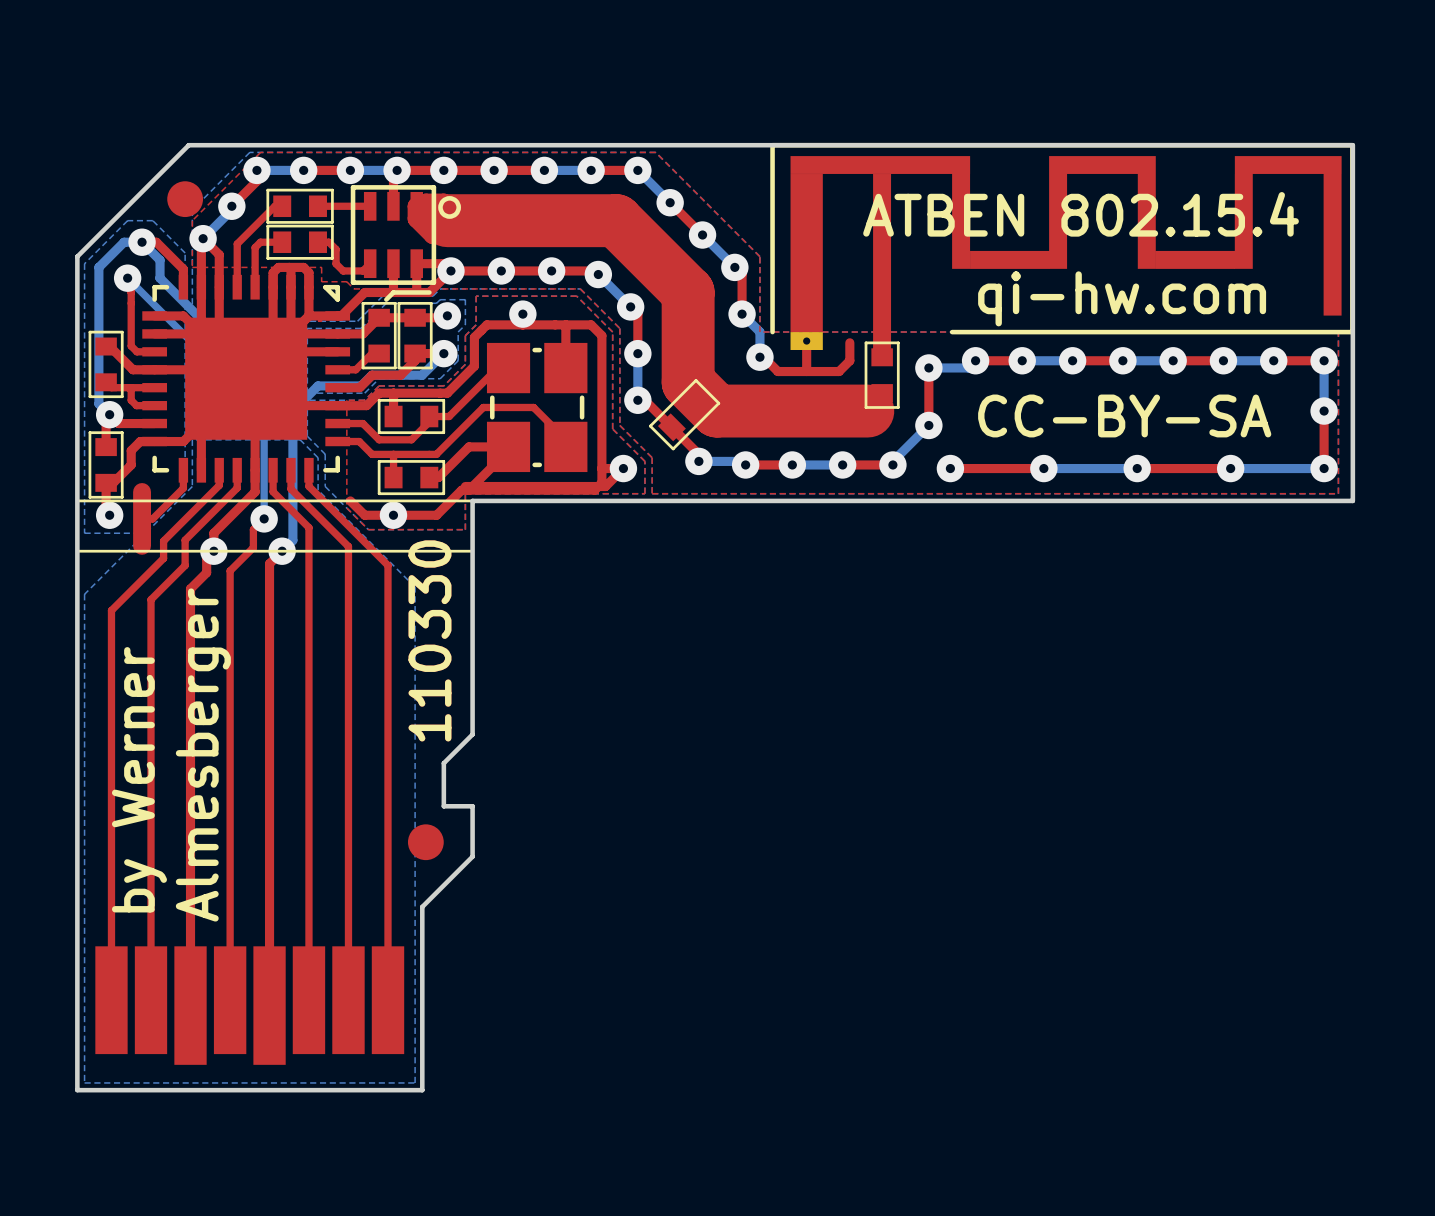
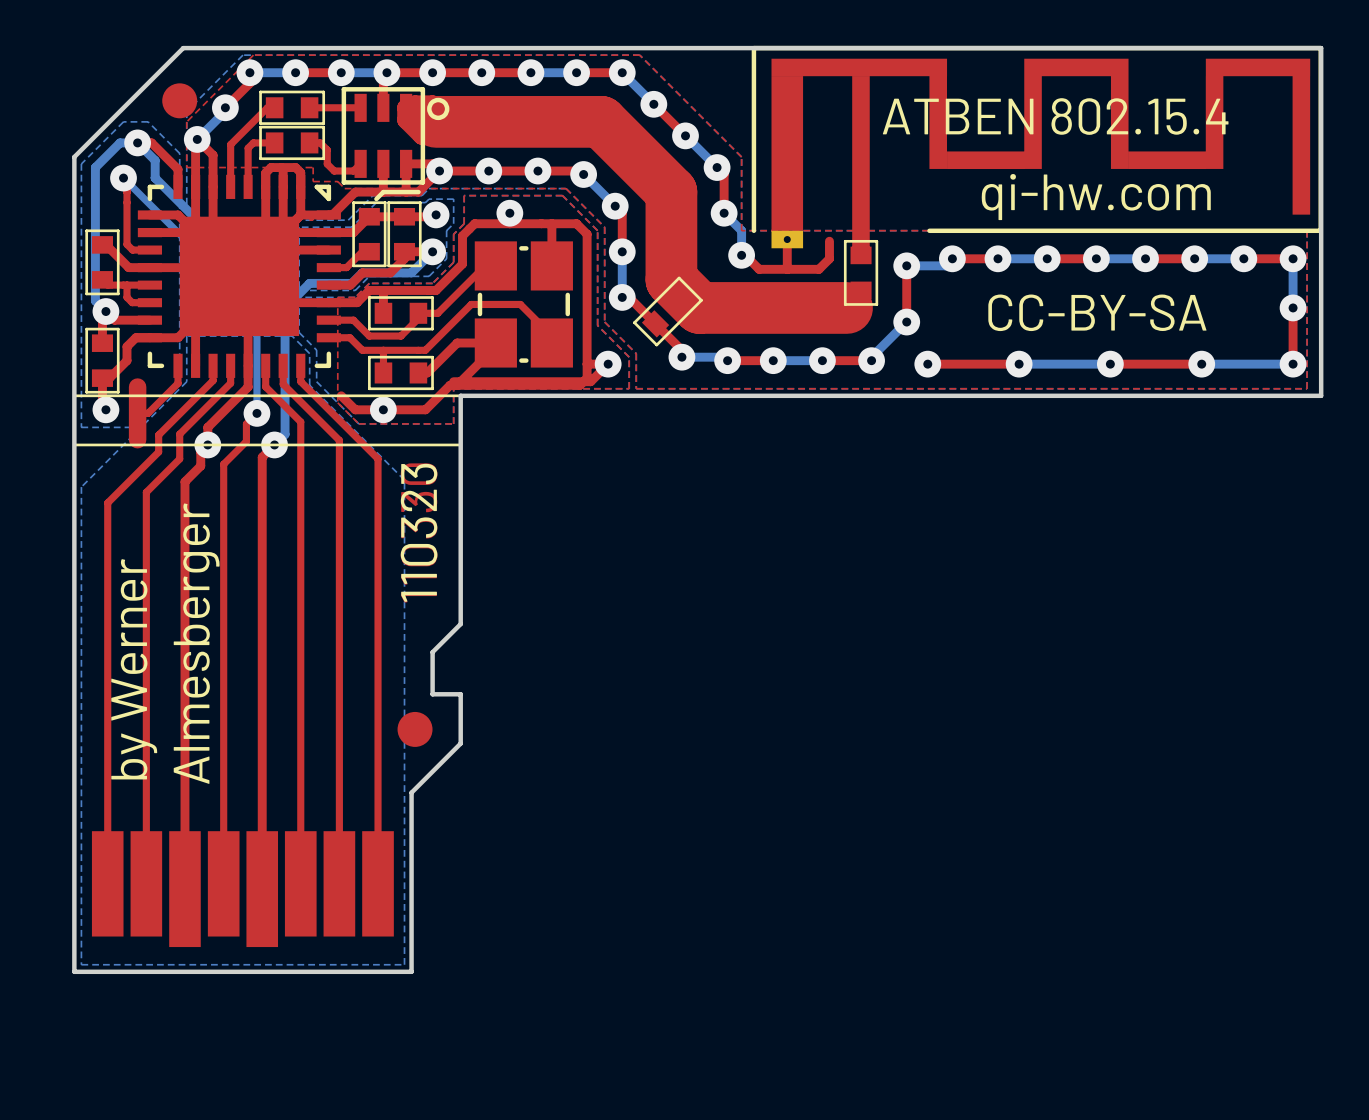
text: 110330 (429, 640) -> 110323 (419, 532)

